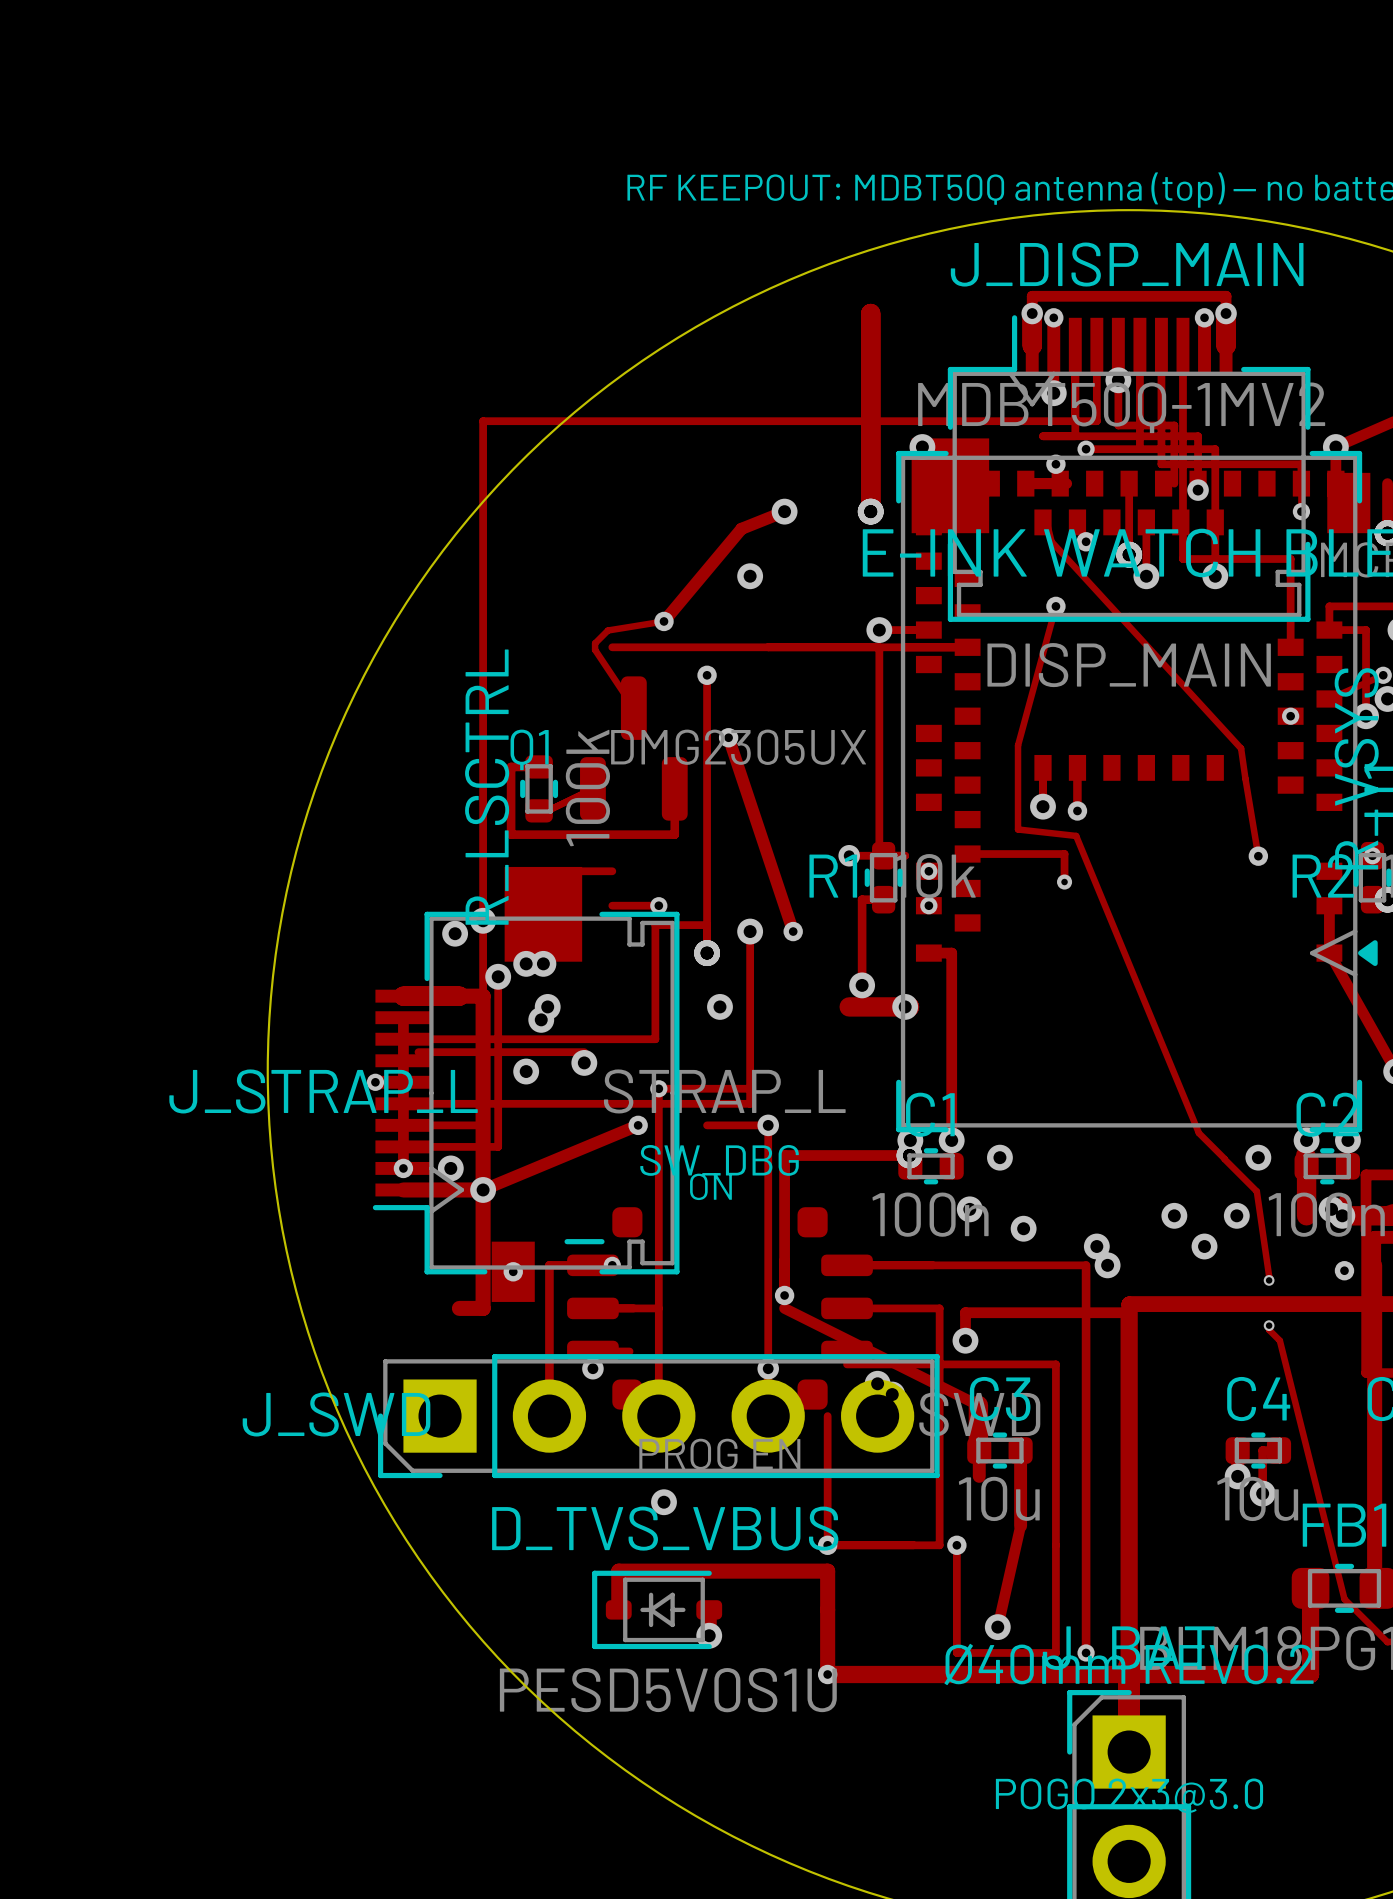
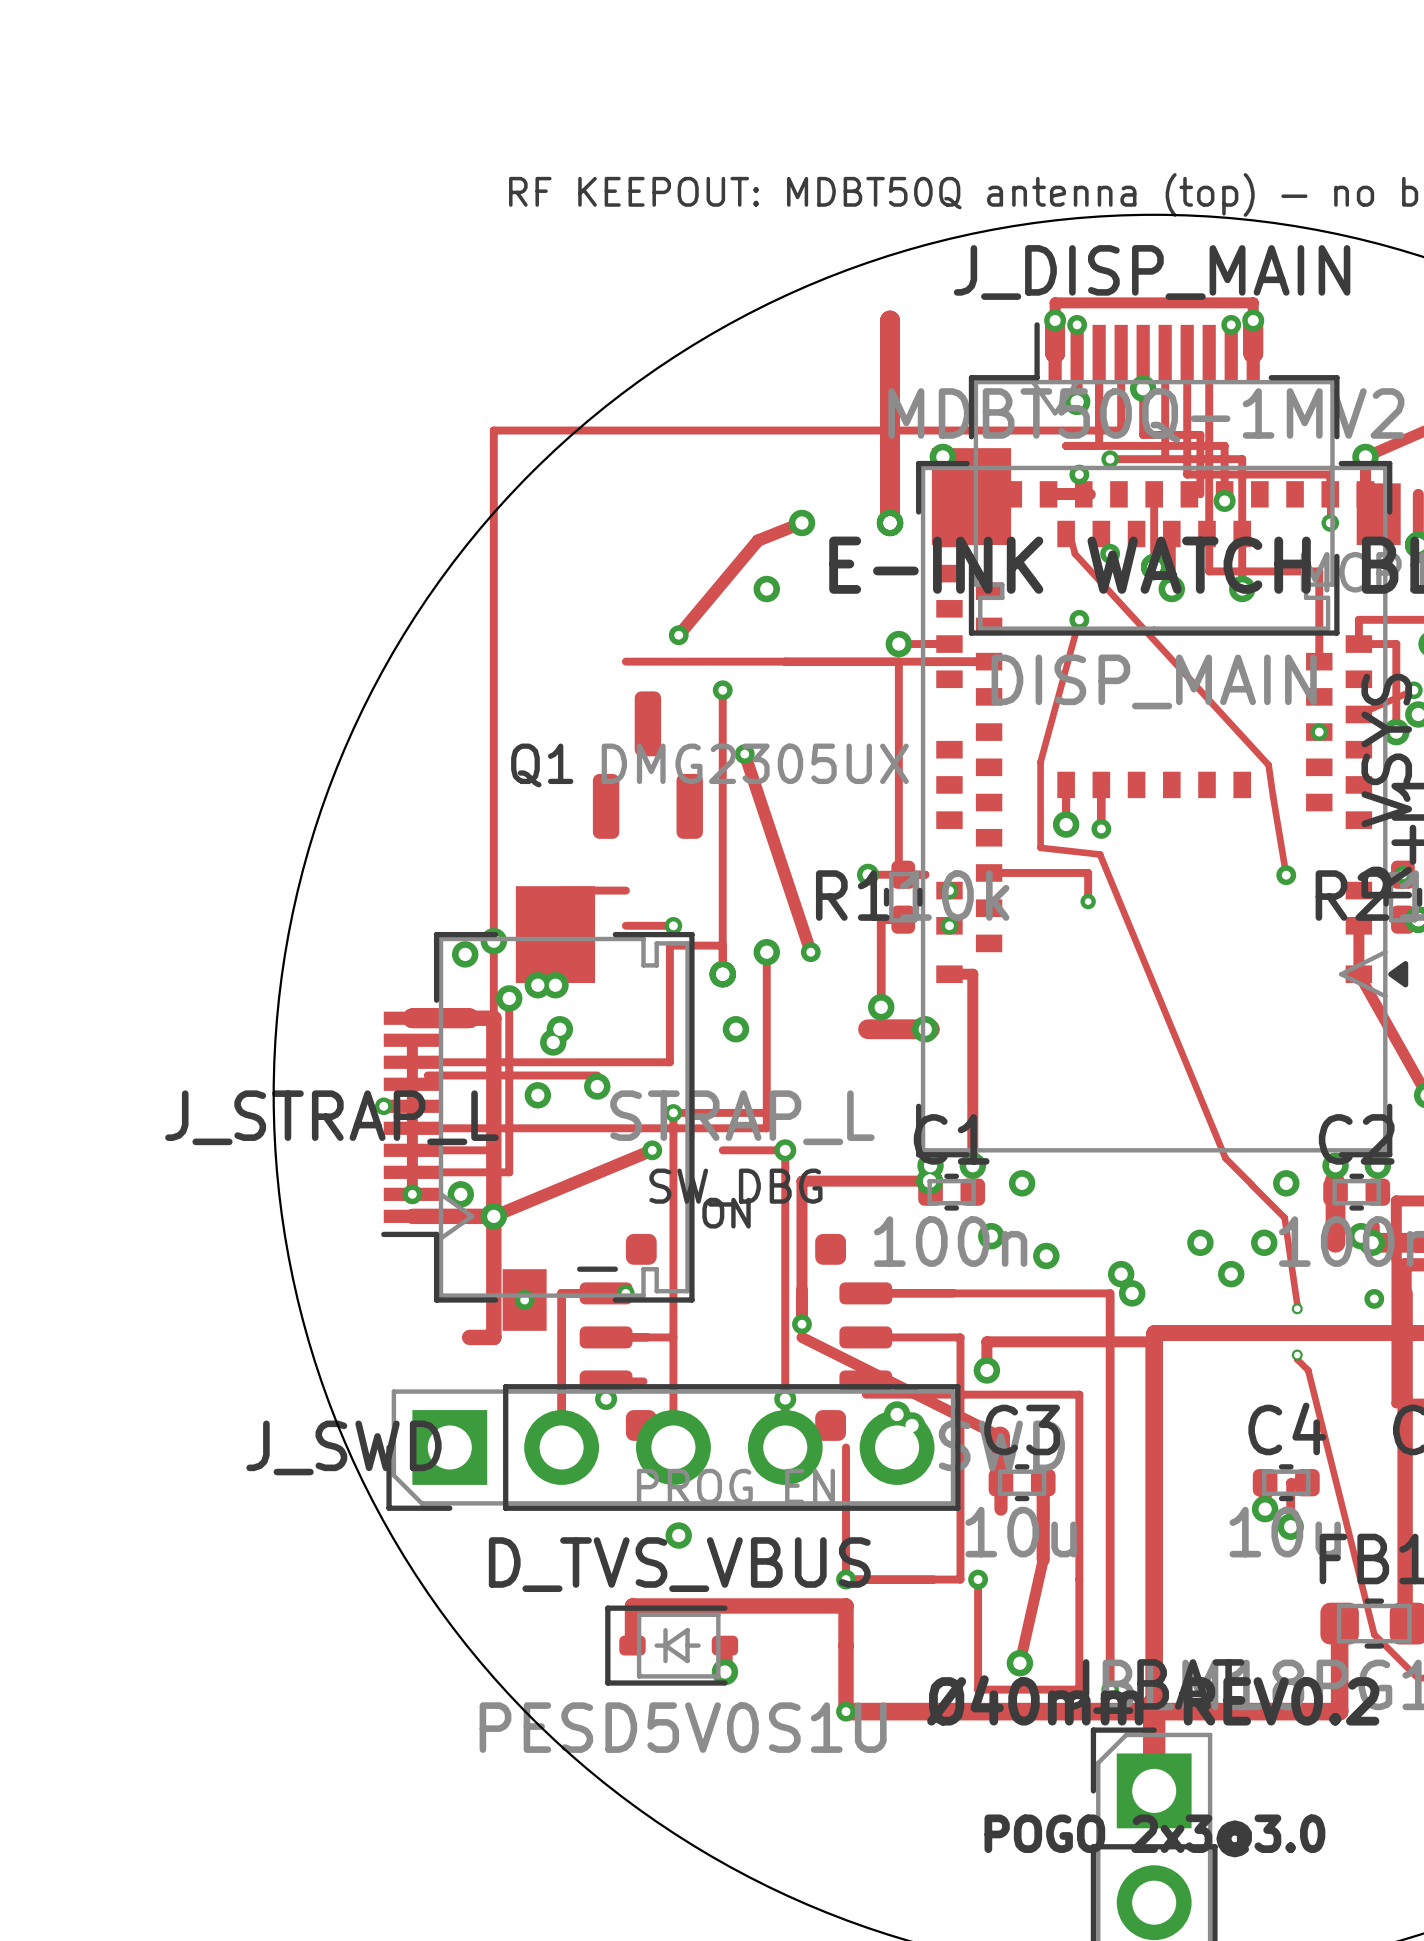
track: (663, 621) (608, 630) (595, 643) (595, 649) (633, 708) -> none
track: (534, 766) (511, 766) (511, 834) (674, 834) (674, 804) -> none
R_LSCTRL: 100k (539, 788) -> none
track: (592, 788) (547, 810) -> none

